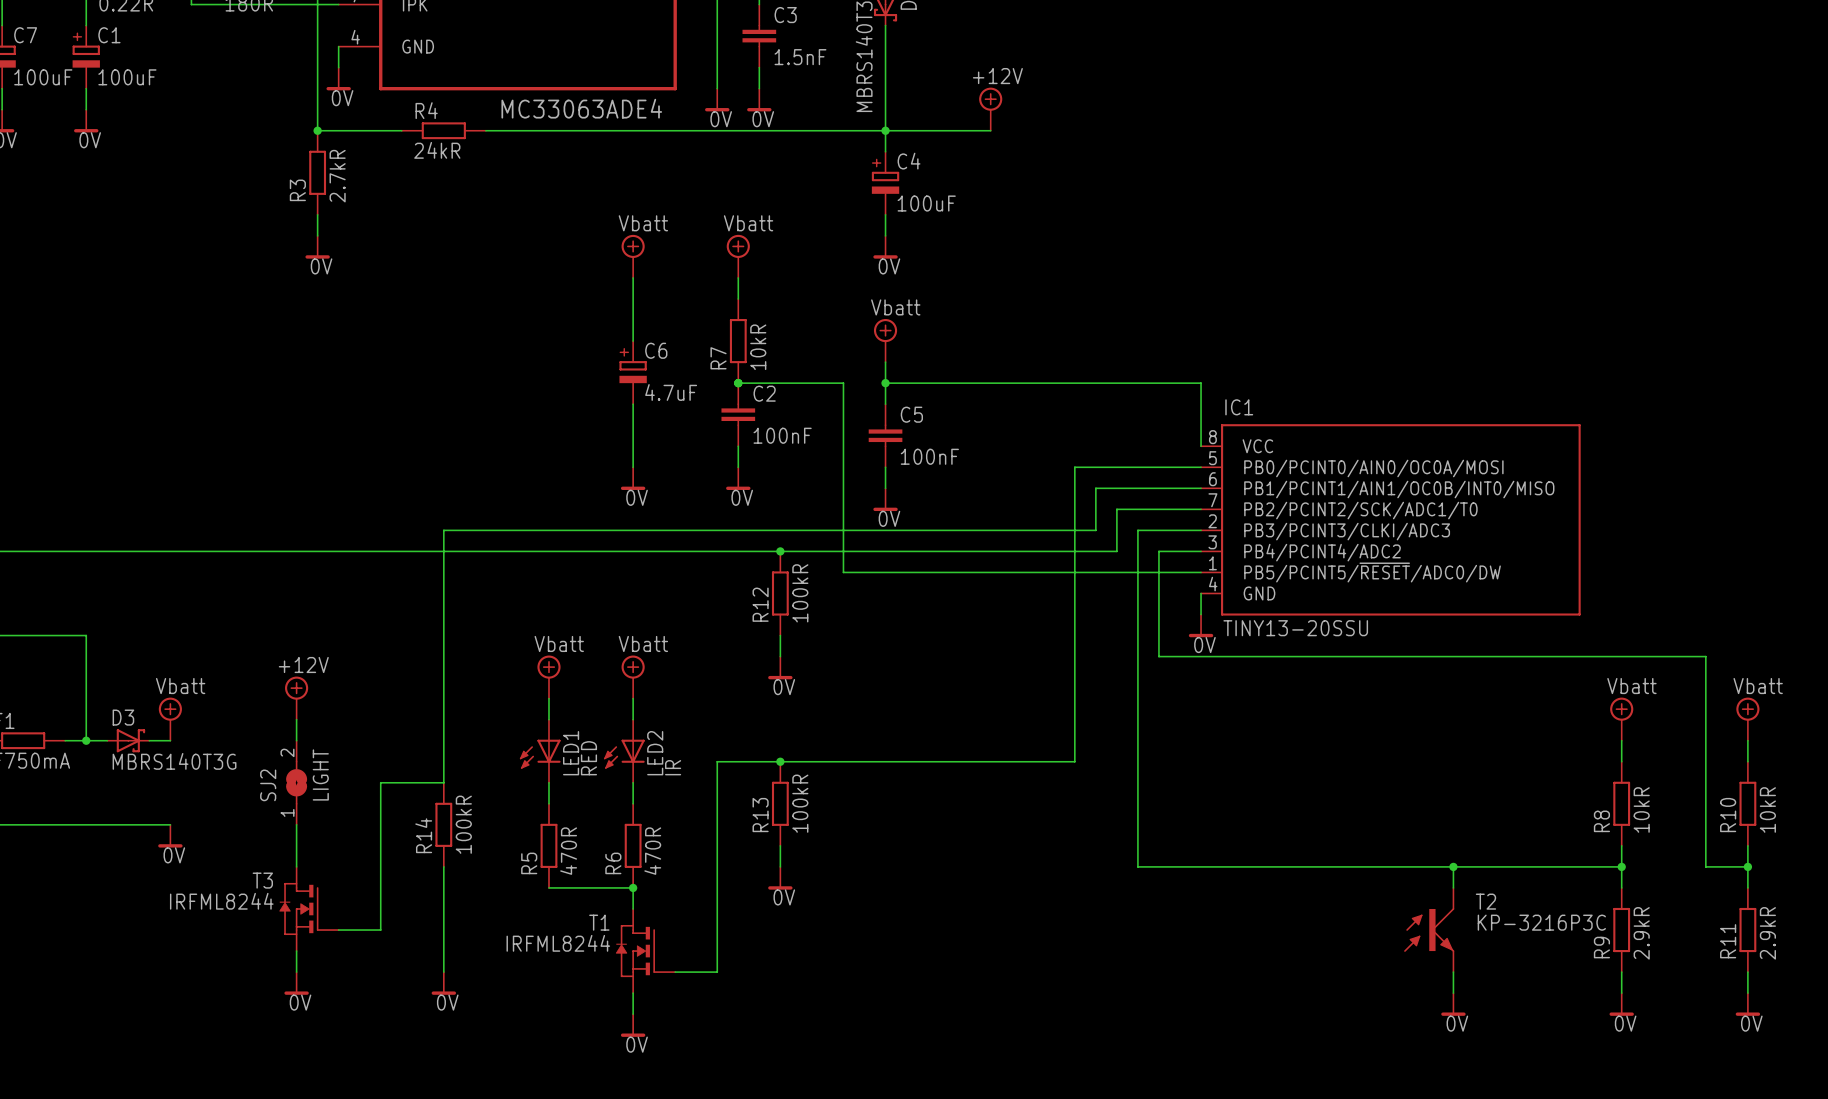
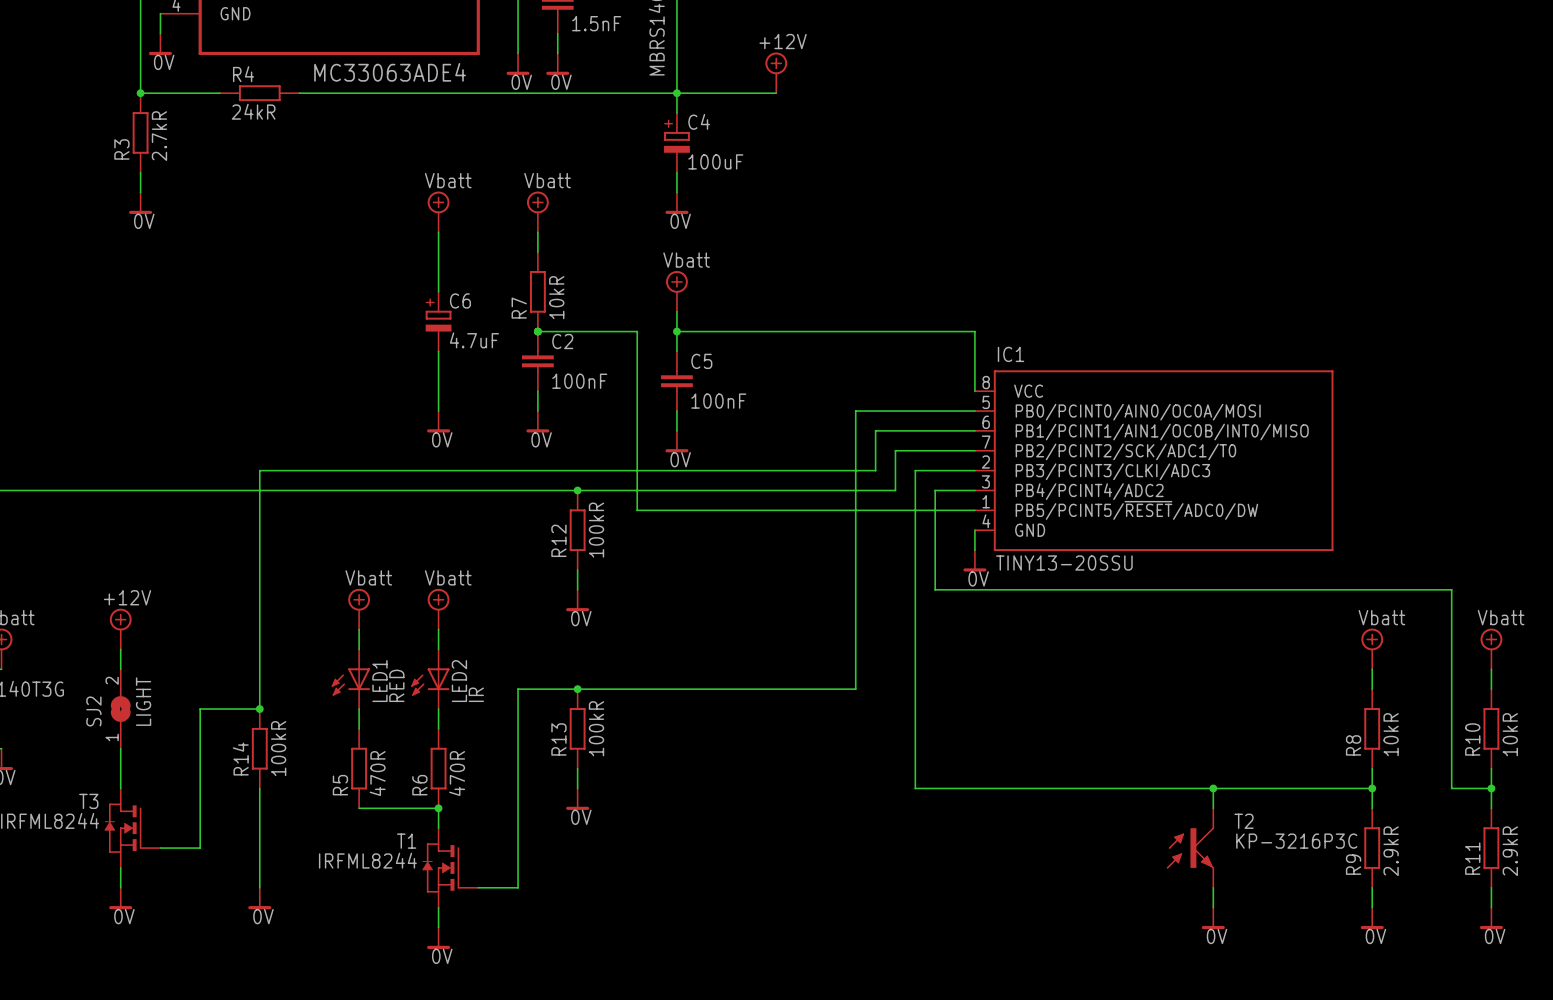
junction: none -> (259, 709)

